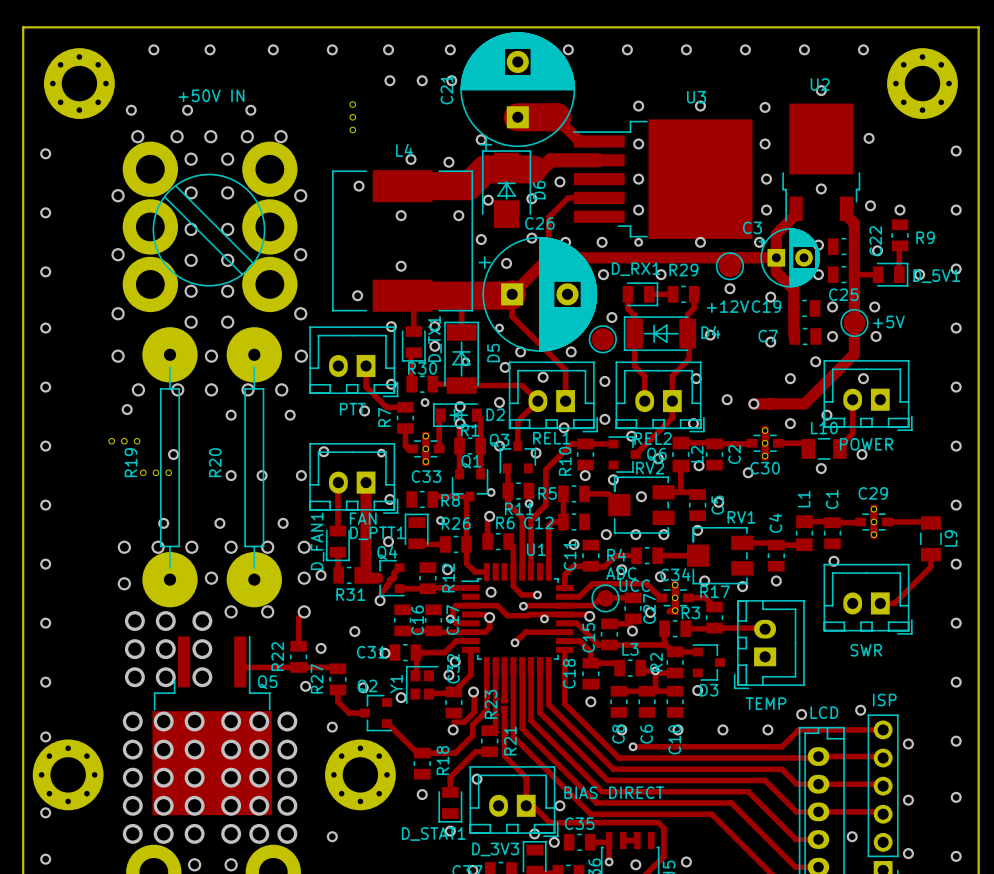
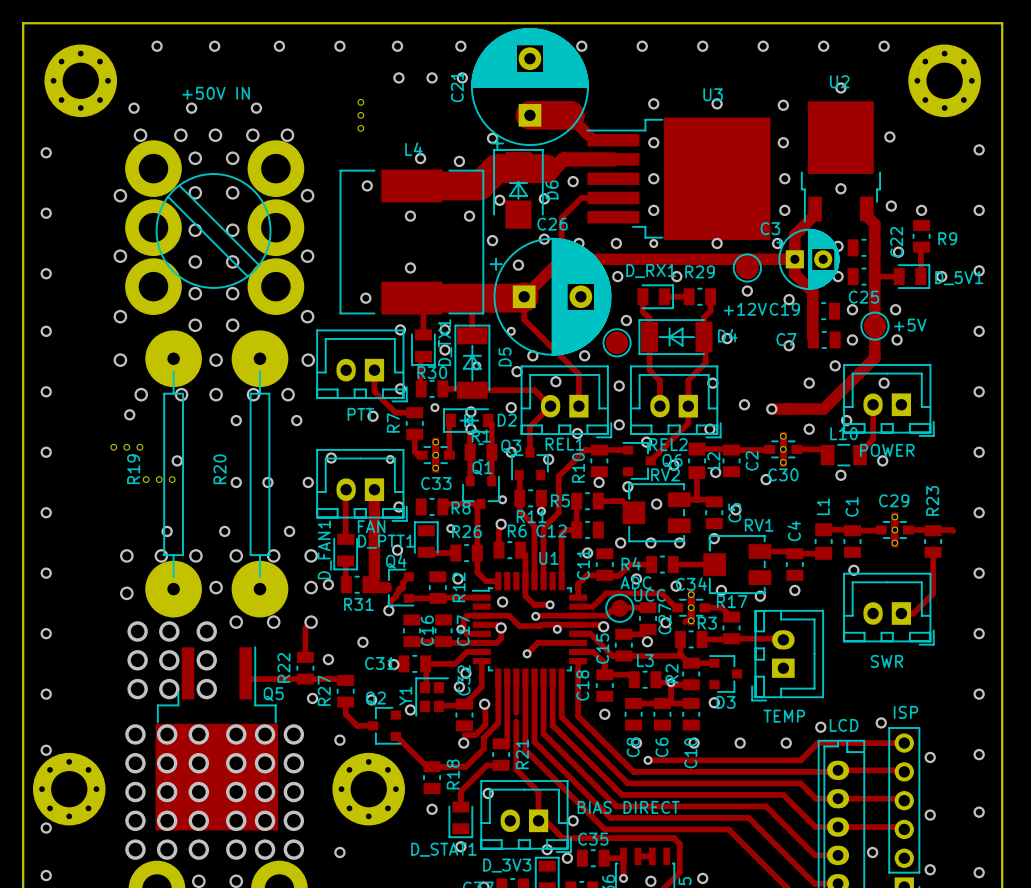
L9: (930, 538) -> none
track: (930, 554) (930, 567) (894, 603) (892, 603) -> (933, 552) (933, 593) (913, 613)
R23 footprint: [500, 697, 509, 713] -> [924, 525, 942, 558]
R23 name position: R23 (490, 704) -> R23 (932, 500)

